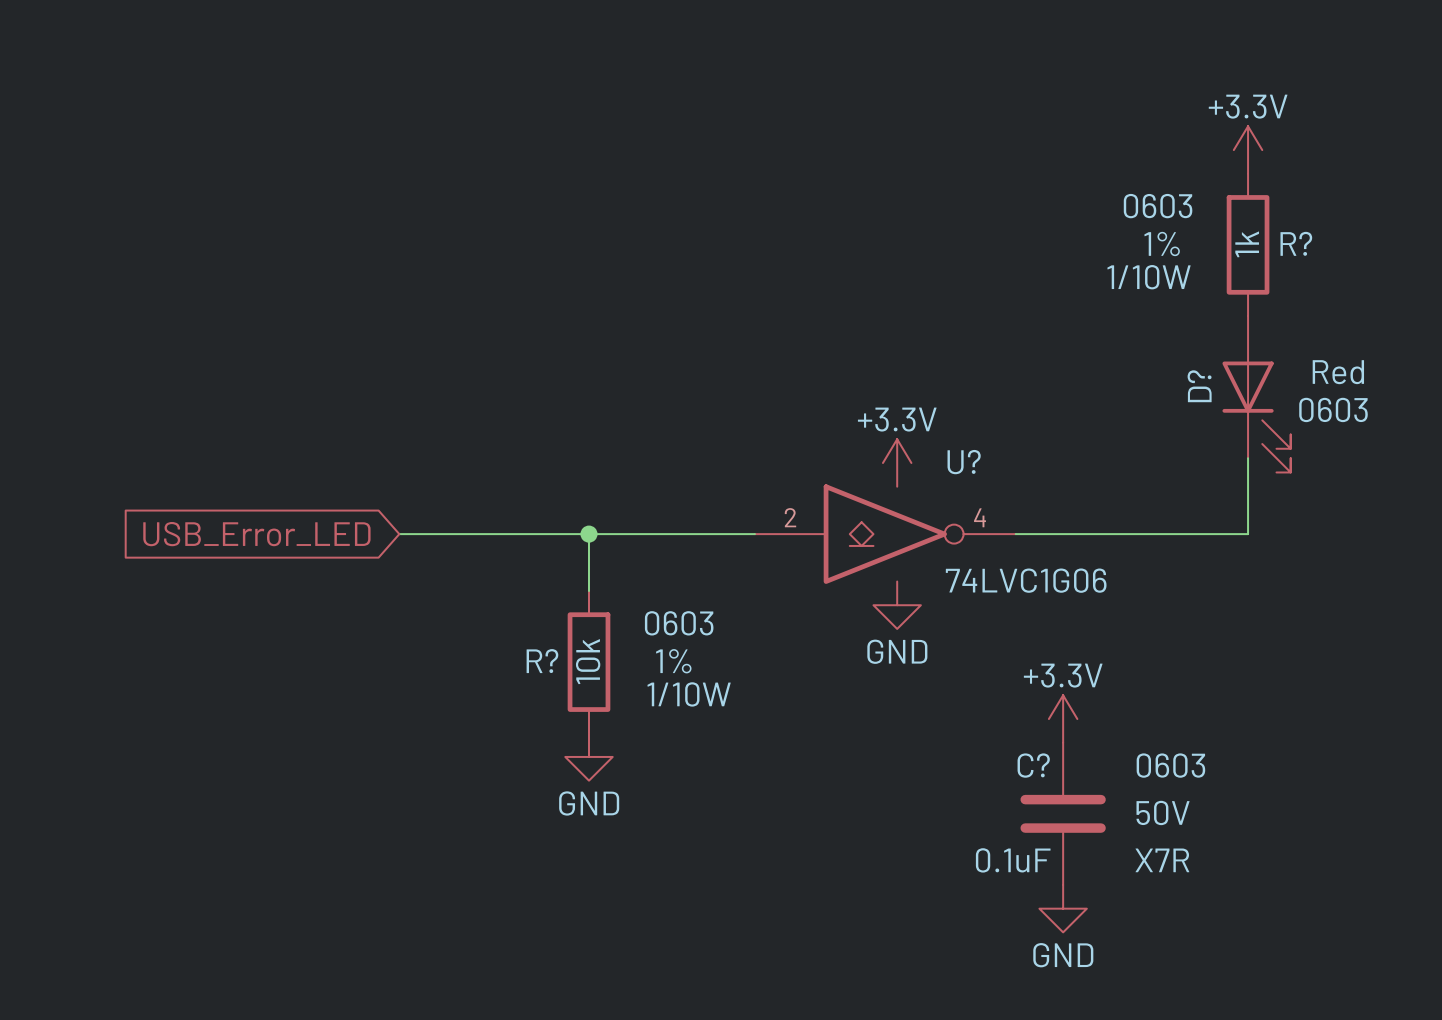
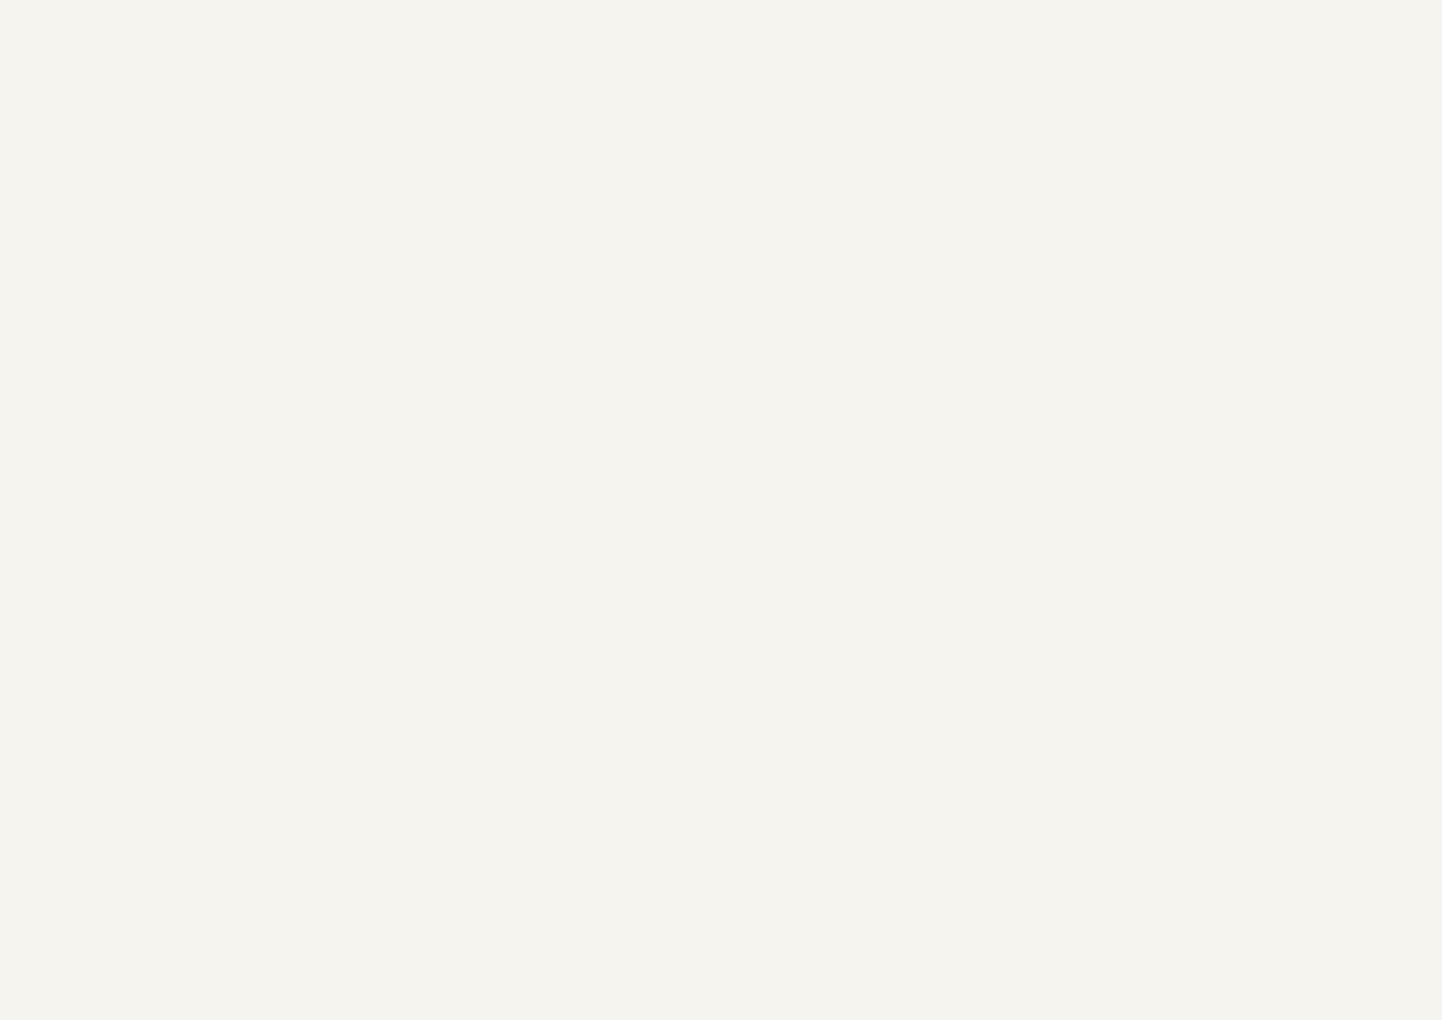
power symbol: +3.3V (1248, 150) -> none
R?: 1k (1248, 244) -> none
D?: Red (1256, 394) -> none
wire: (1248, 458) (1248, 534) (1015, 534) -> none
power symbol: +3.3V (897, 462) -> none
global label: USB_Error_LED (256, 534) -> none
wire: (399, 534) (754, 534) -> none
wire: (589, 534) (589, 591) -> none
junction: (589, 534) -> none
U?: 74LVC1G06 (885, 534) -> none
power symbol: GND (897, 605) -> none
R?: 10k (589, 662) -> none
power symbol: +3.3V (1063, 719) -> none
power symbol: GND (589, 756) -> none
C?: 0.1uF (1063, 813) -> none
power symbol: GND (1063, 908) -> none

